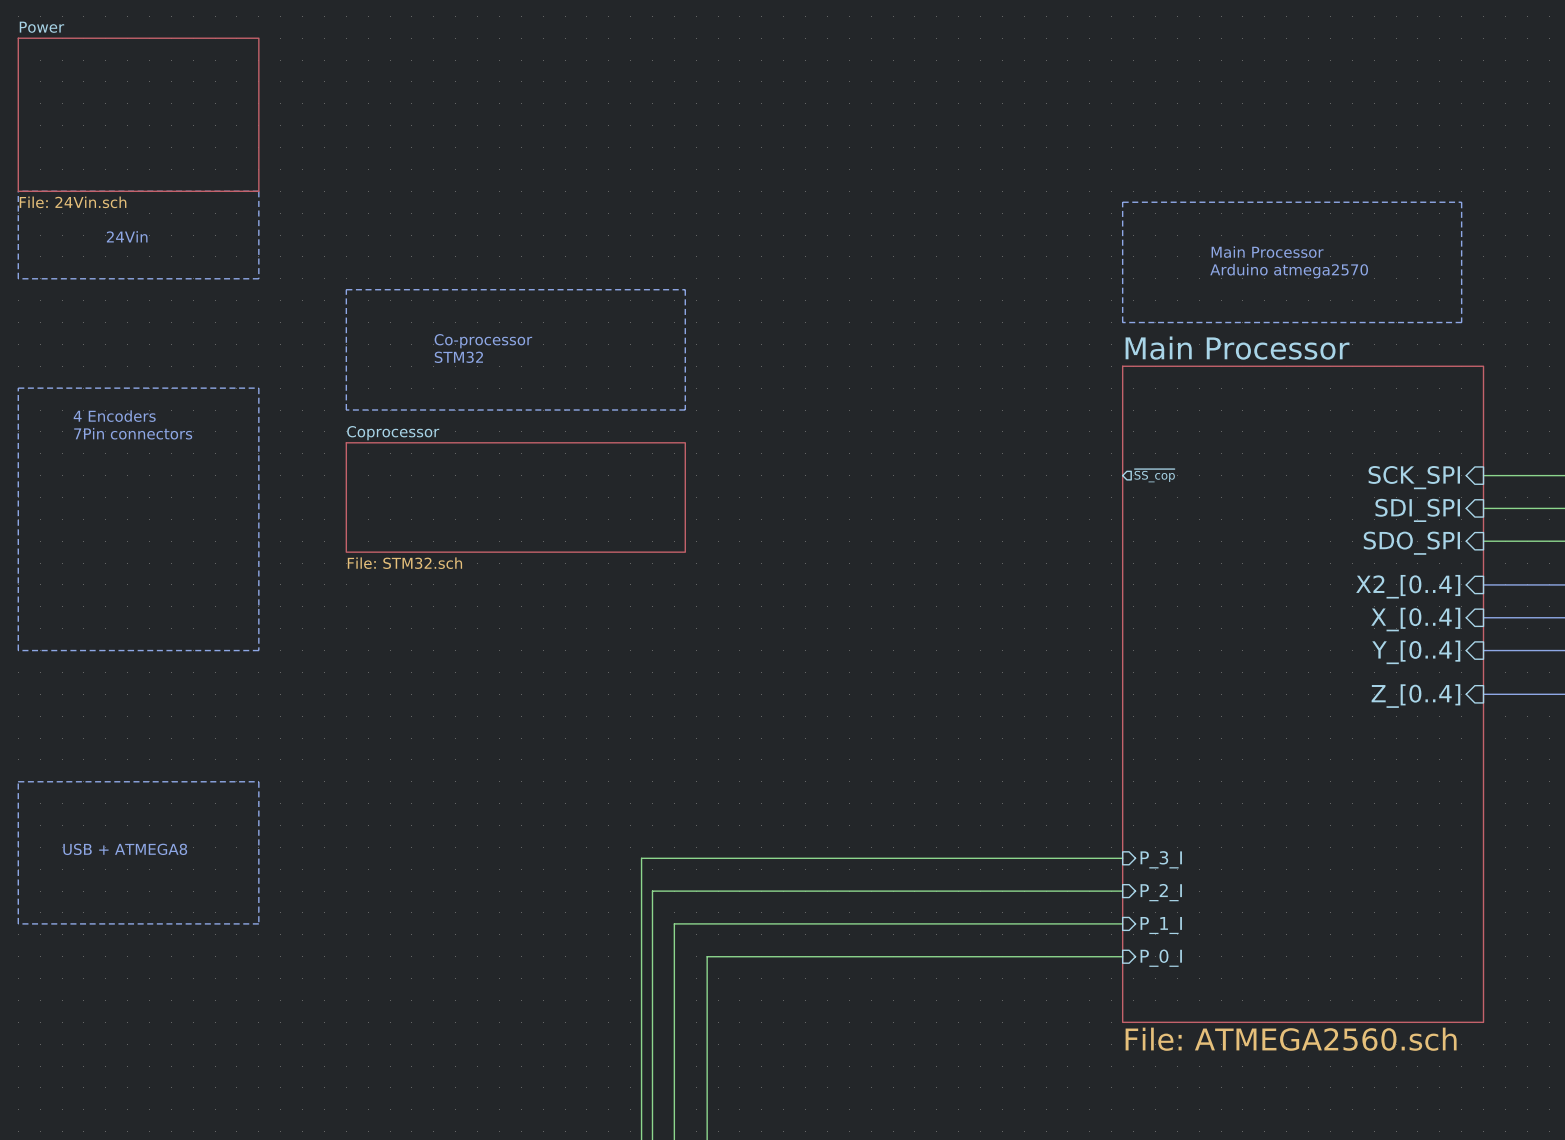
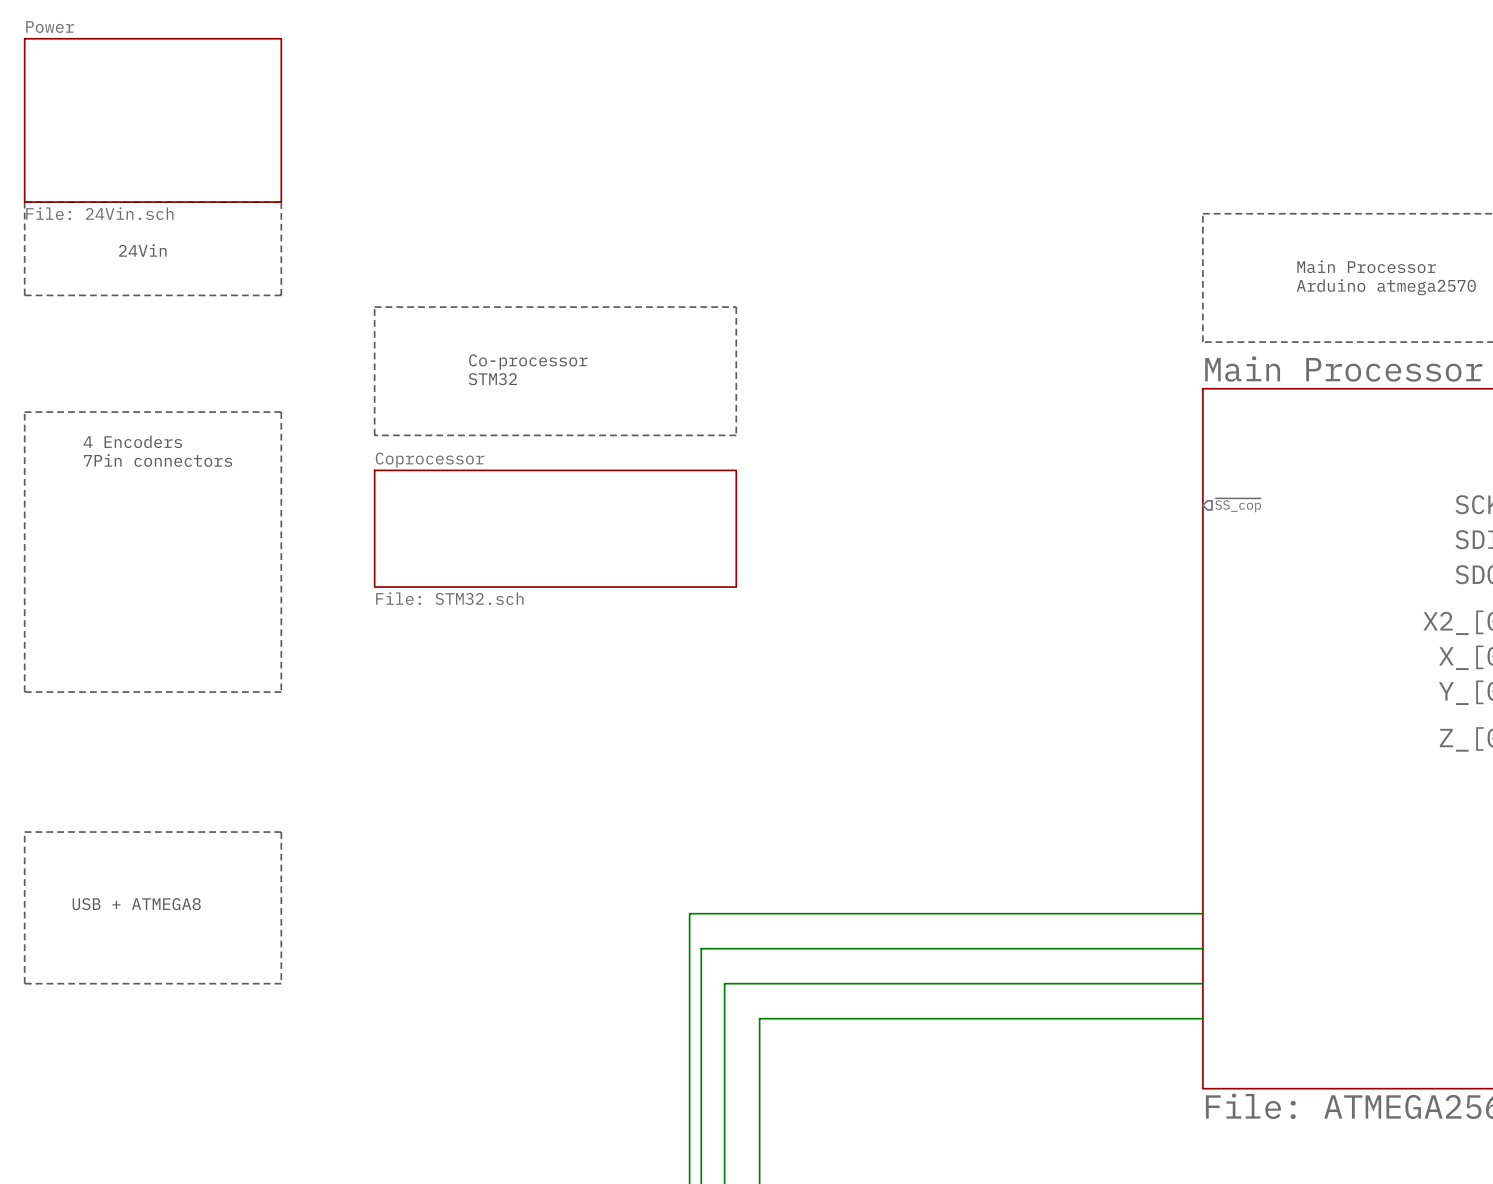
sheet pin: P_3_I (1161, 859) -> none
sheet pin: P_2_I (1161, 892) -> none
sheet pin: P_1_I (1161, 925) -> none
sheet pin: P_0_I (1161, 958) -> none

